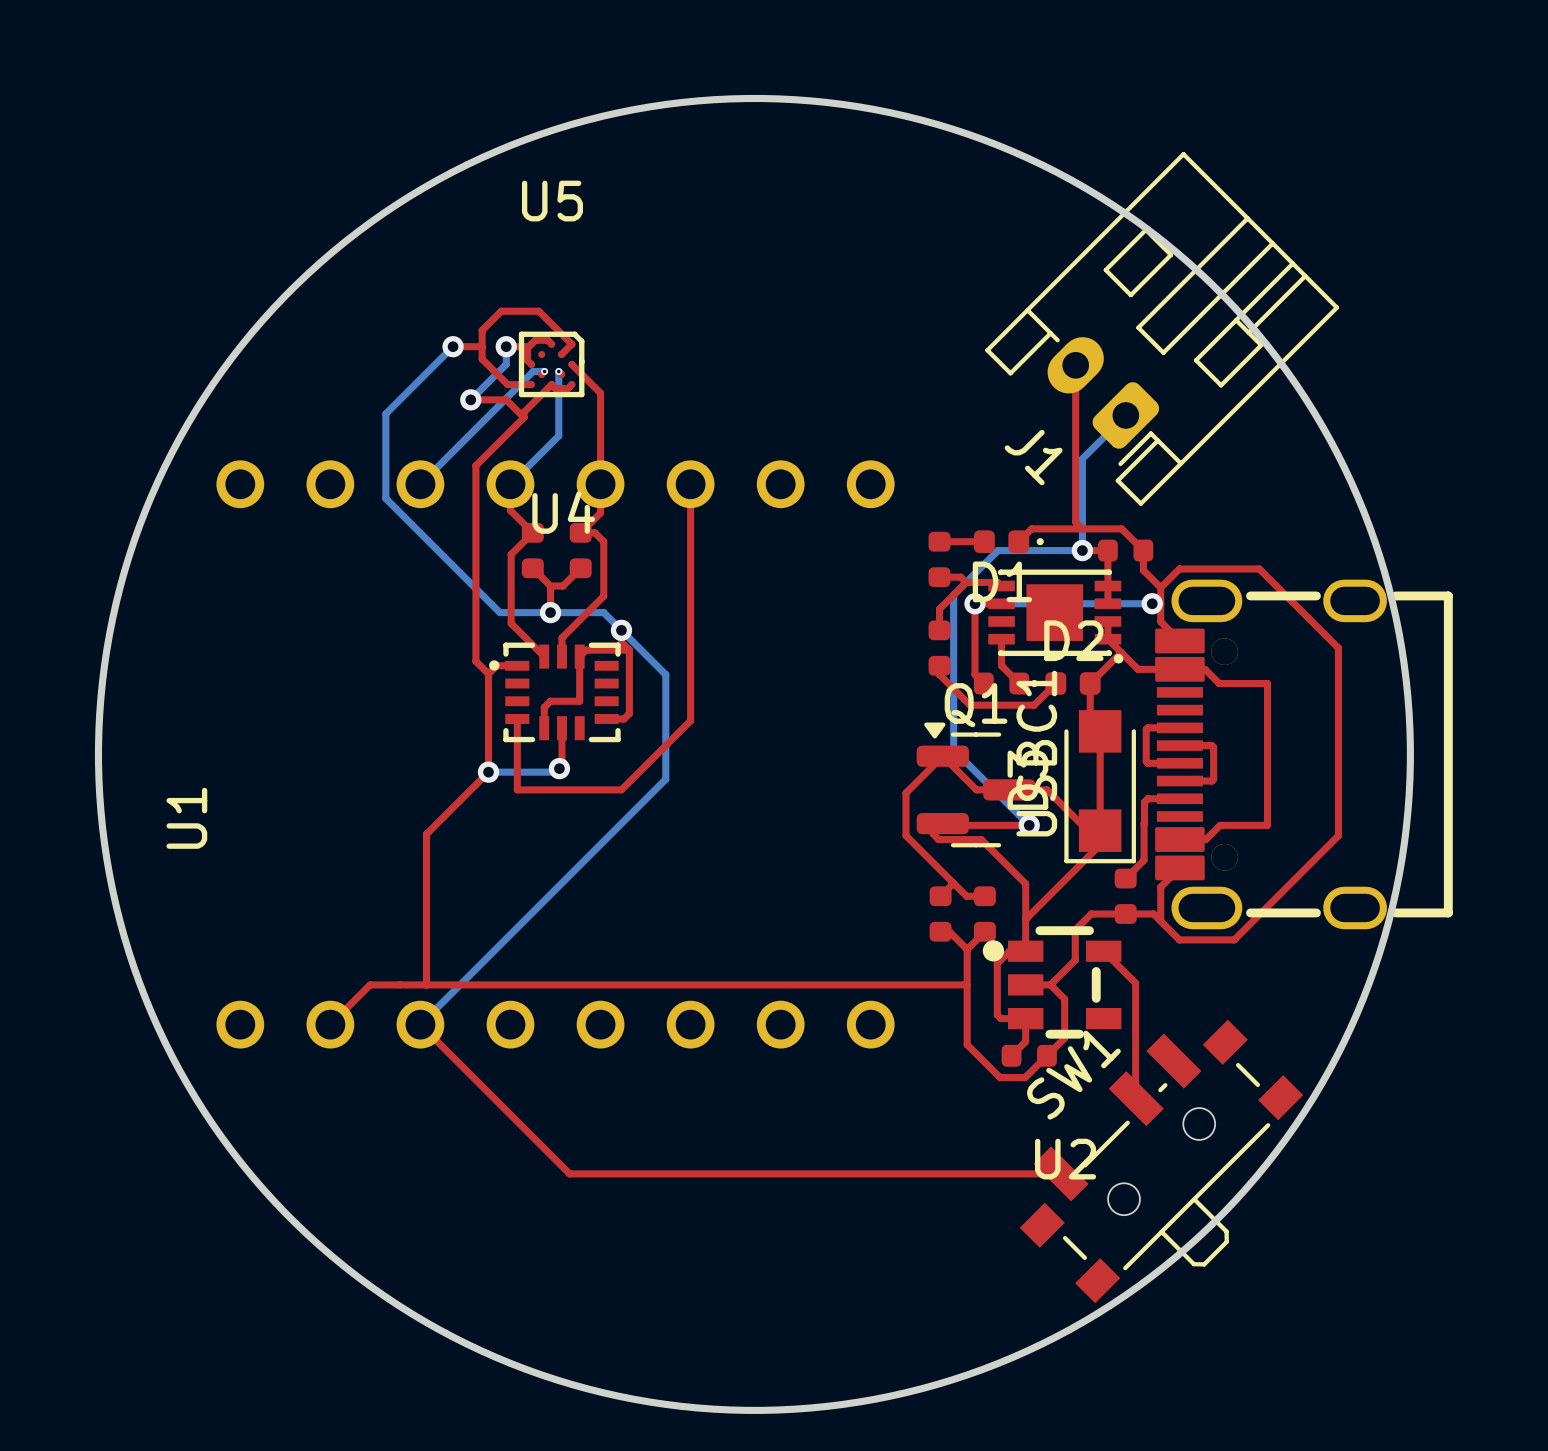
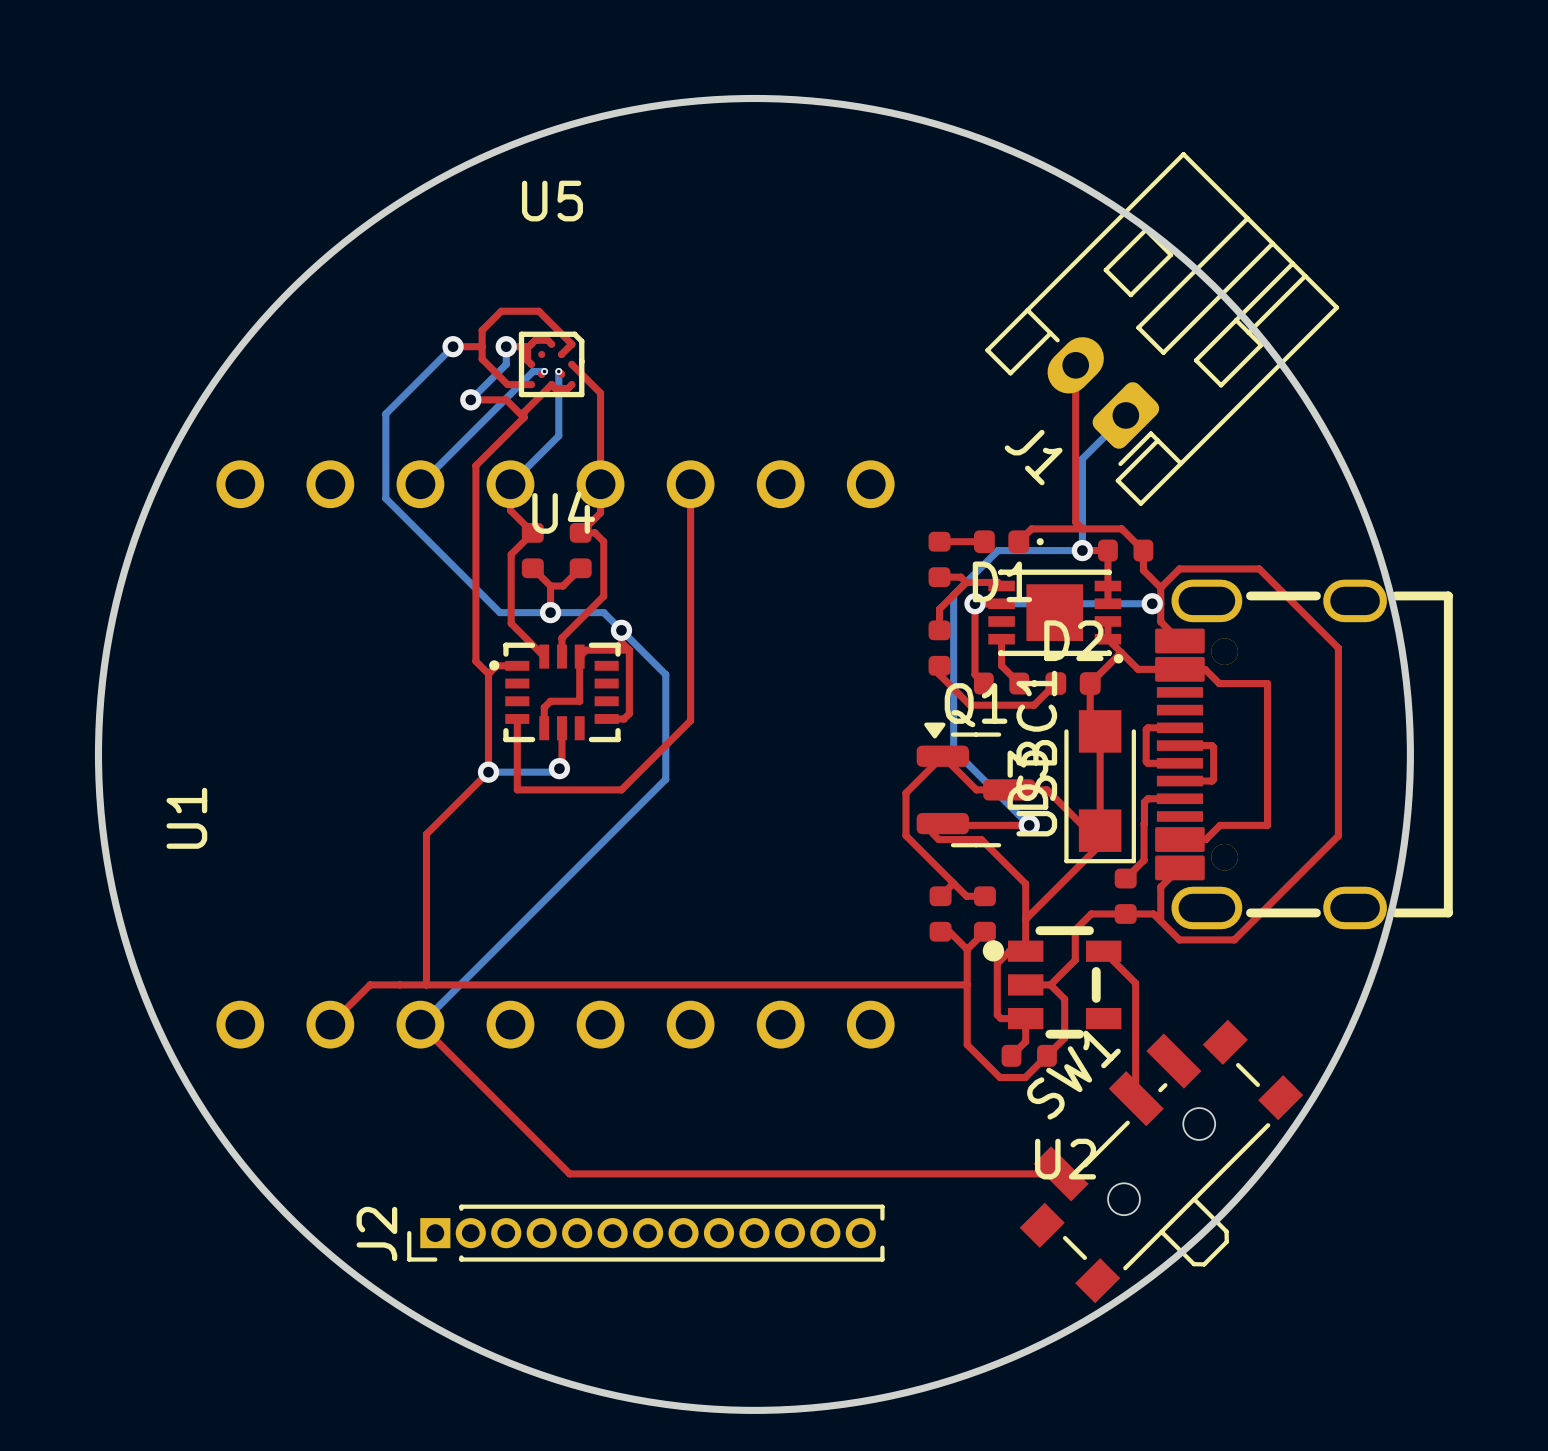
J2: none -> (645, 1233)

